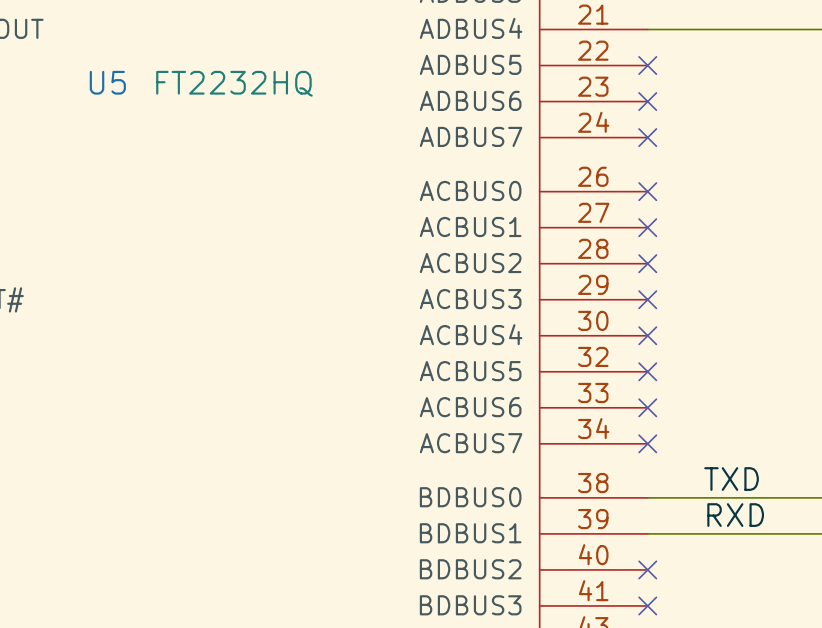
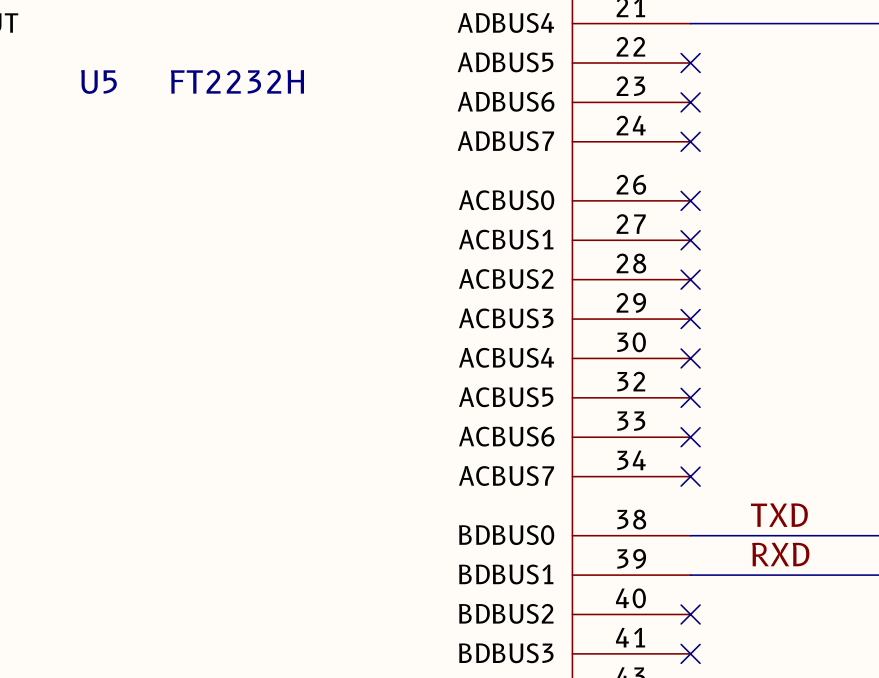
U5 value: FT2232HQ (234, 83) -> FT2232H (237, 81)

